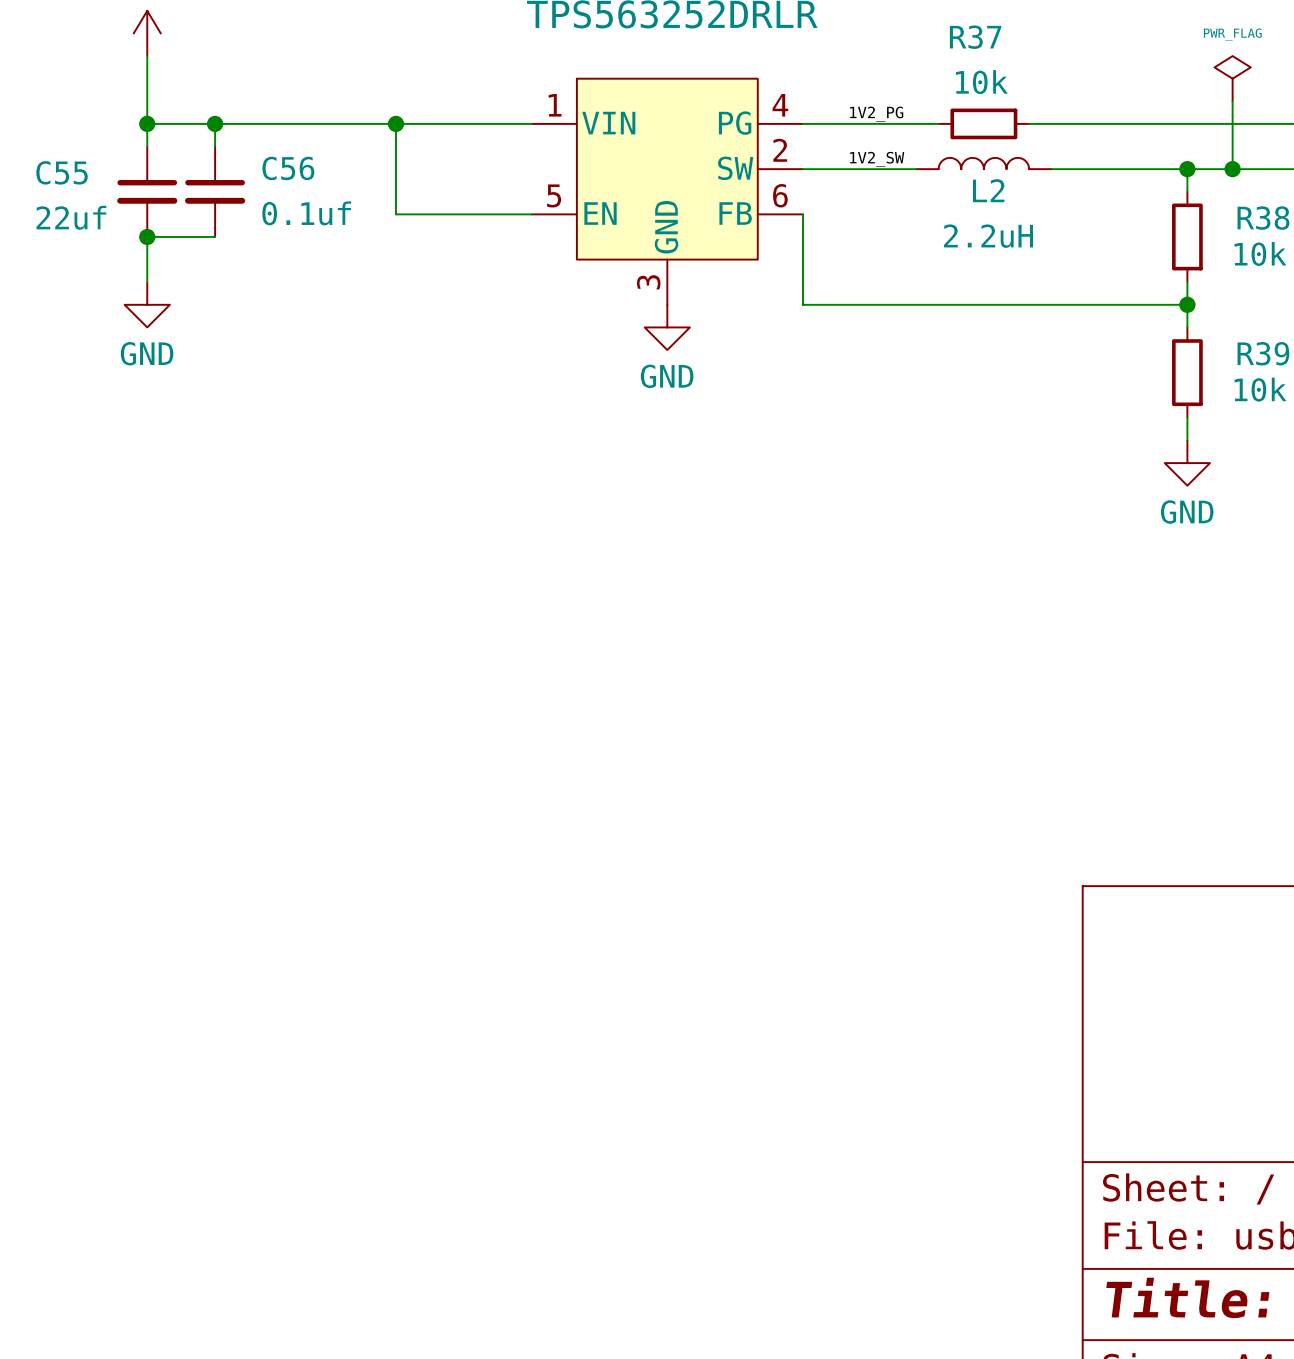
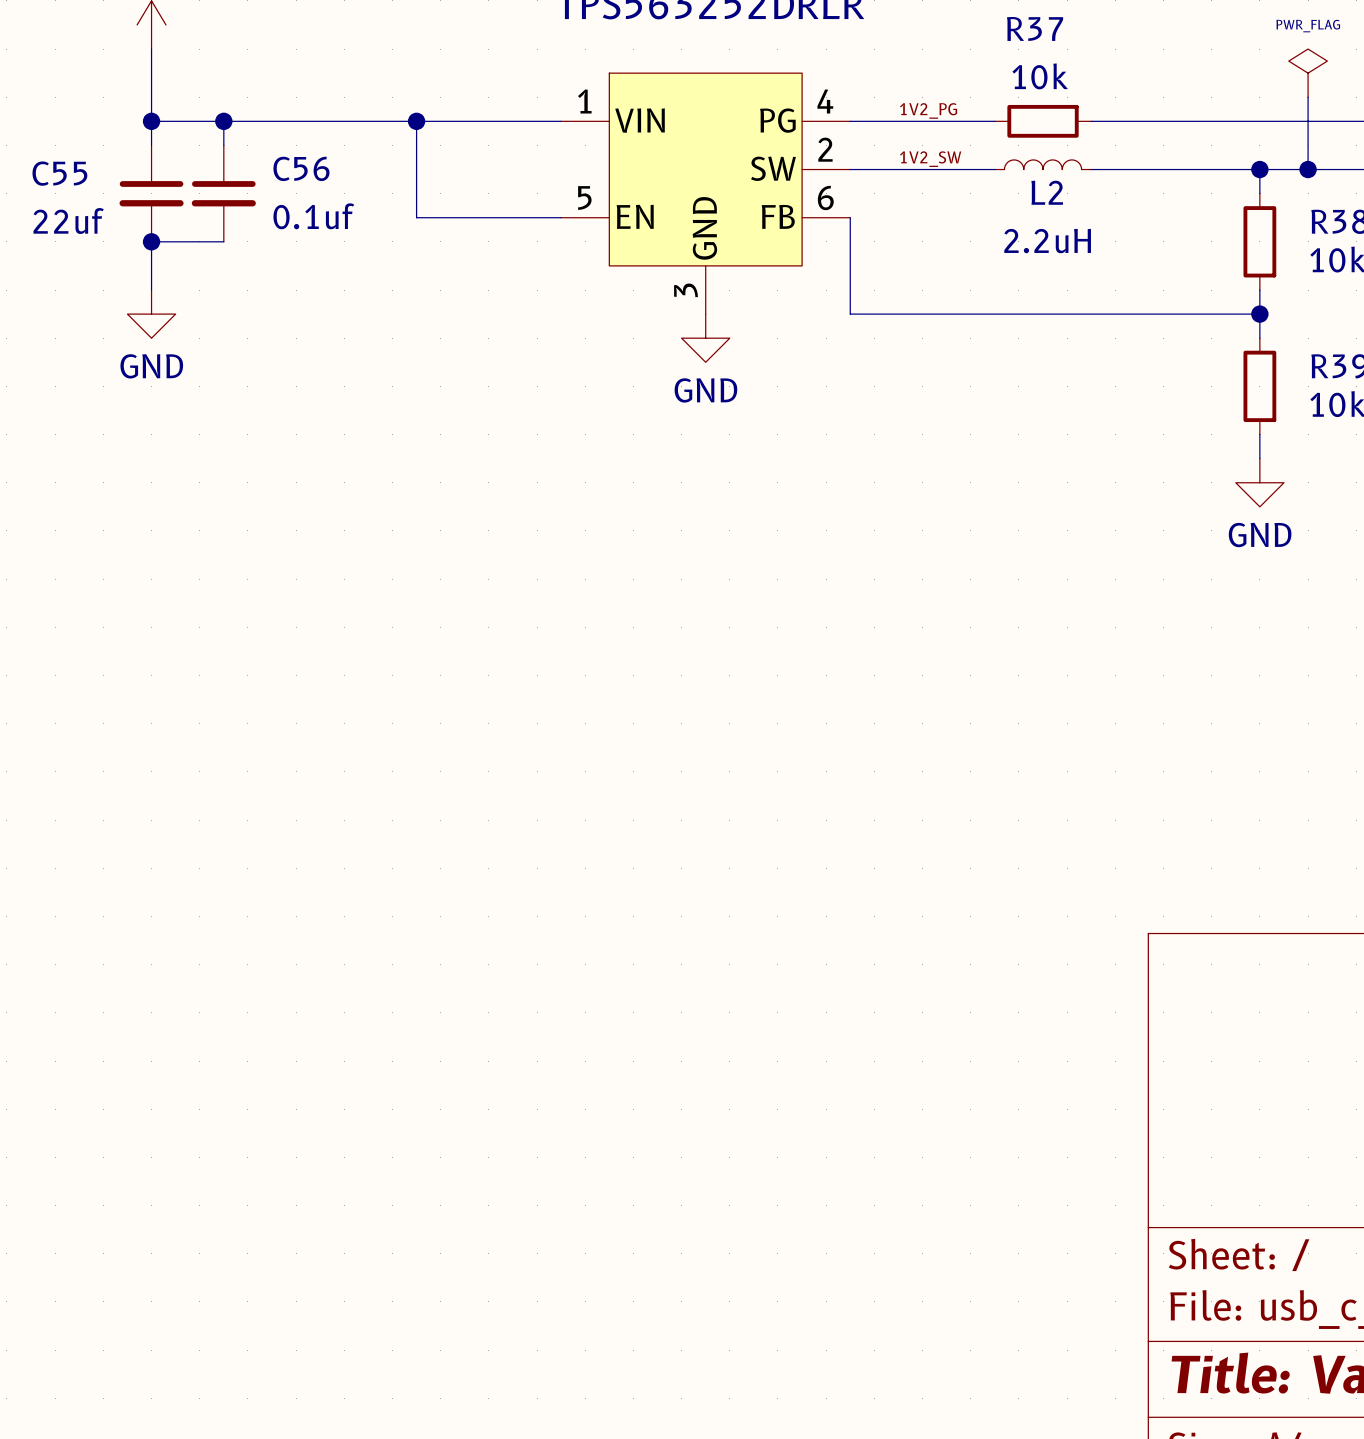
L2 symbol: [916, 157, 1052, 170] -> [994, 159, 1092, 170]

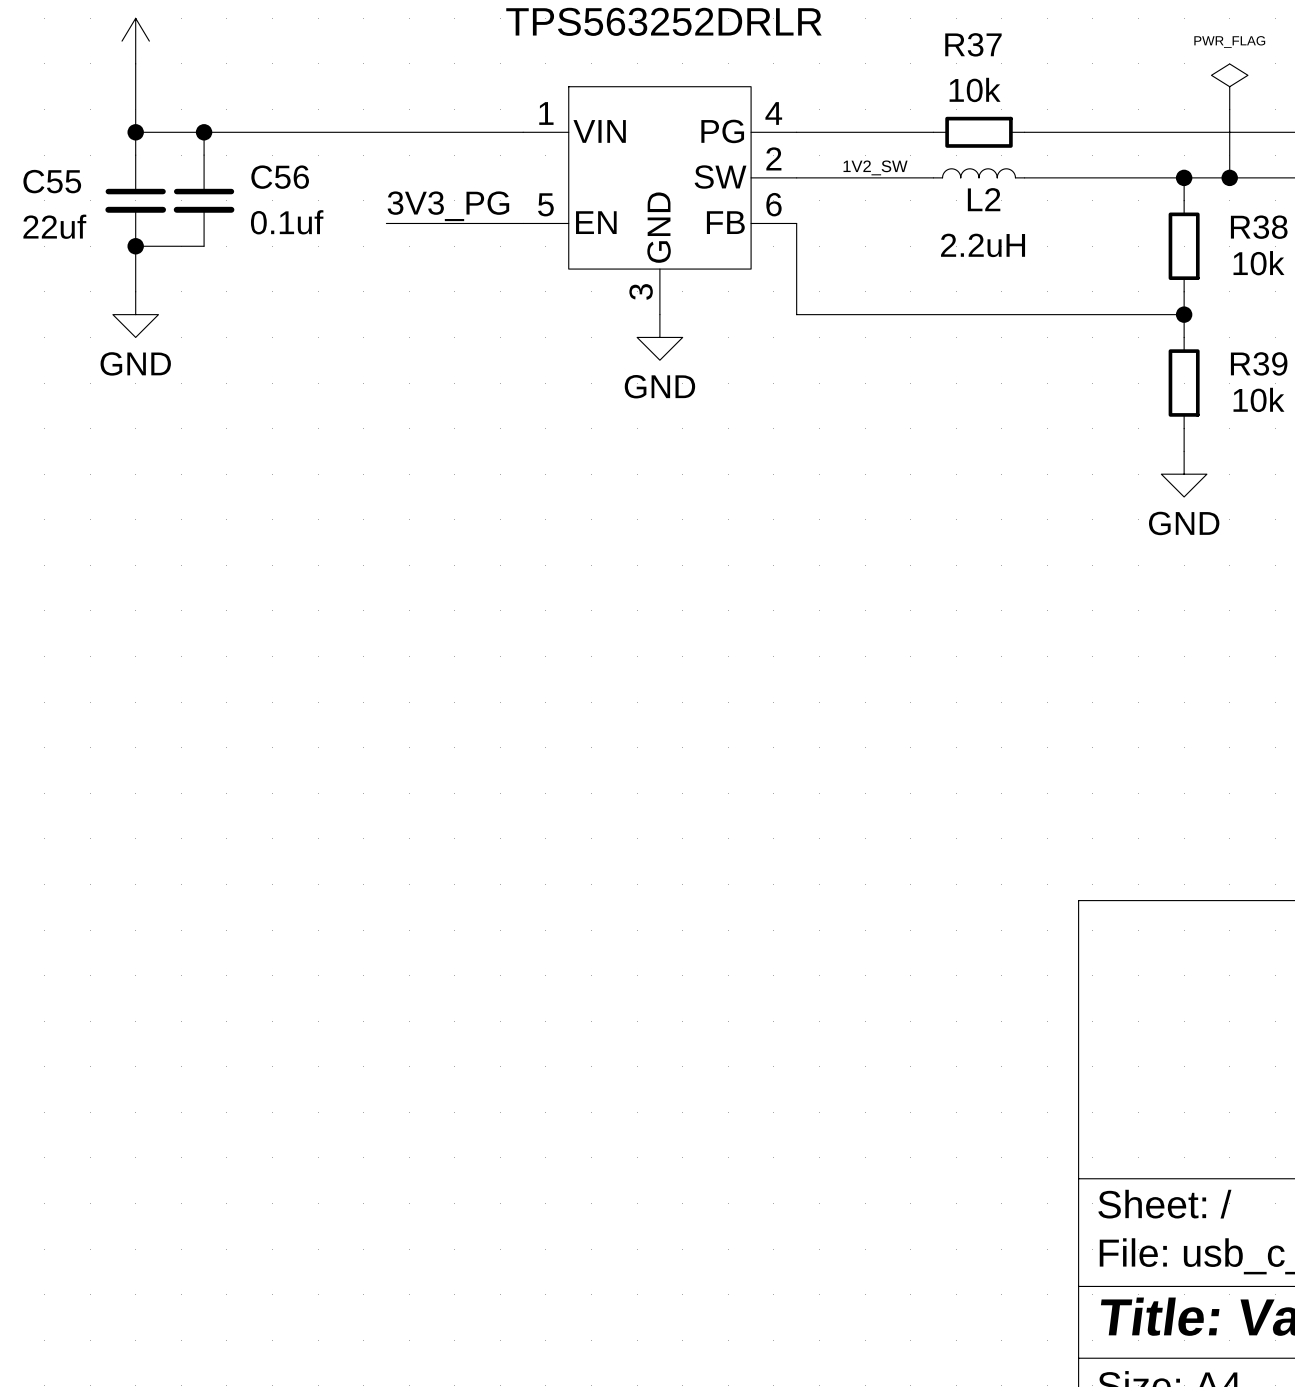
label: 1V2_PG (928, 110) -> none
wire: (416, 121) (416, 217) -> none
junction: (416, 121) -> none
label: none -> 3V3_PG (448, 206)

